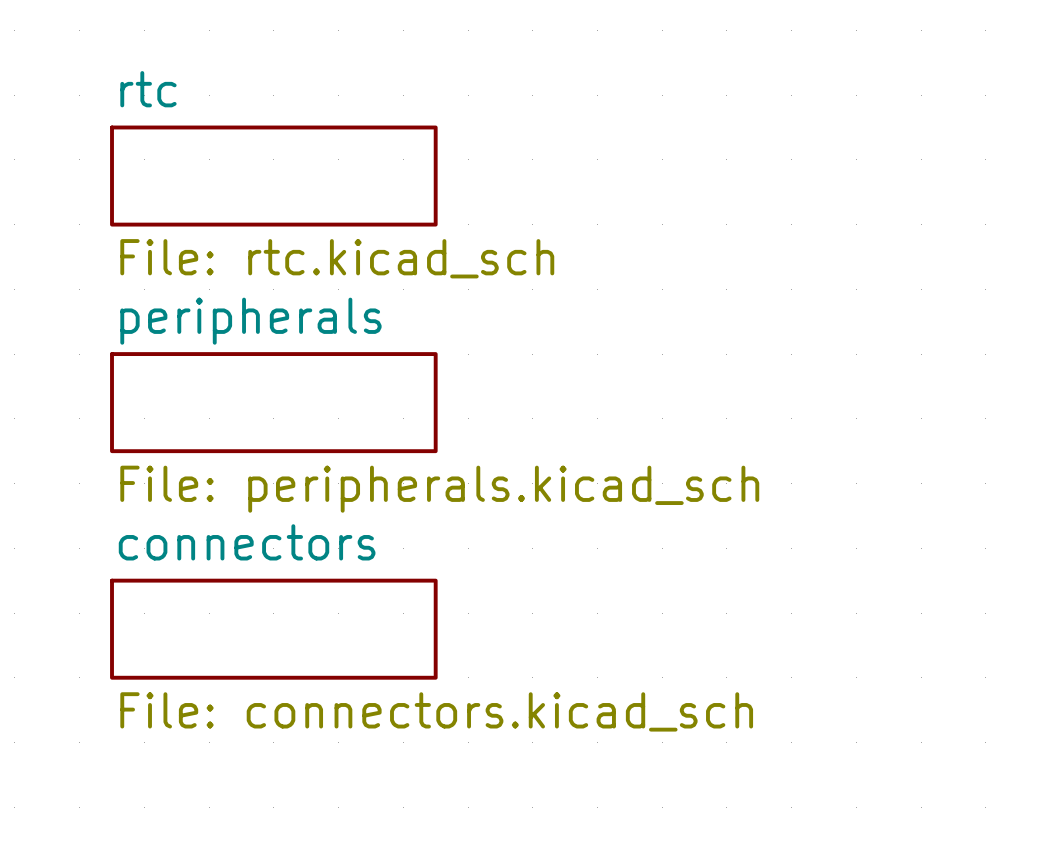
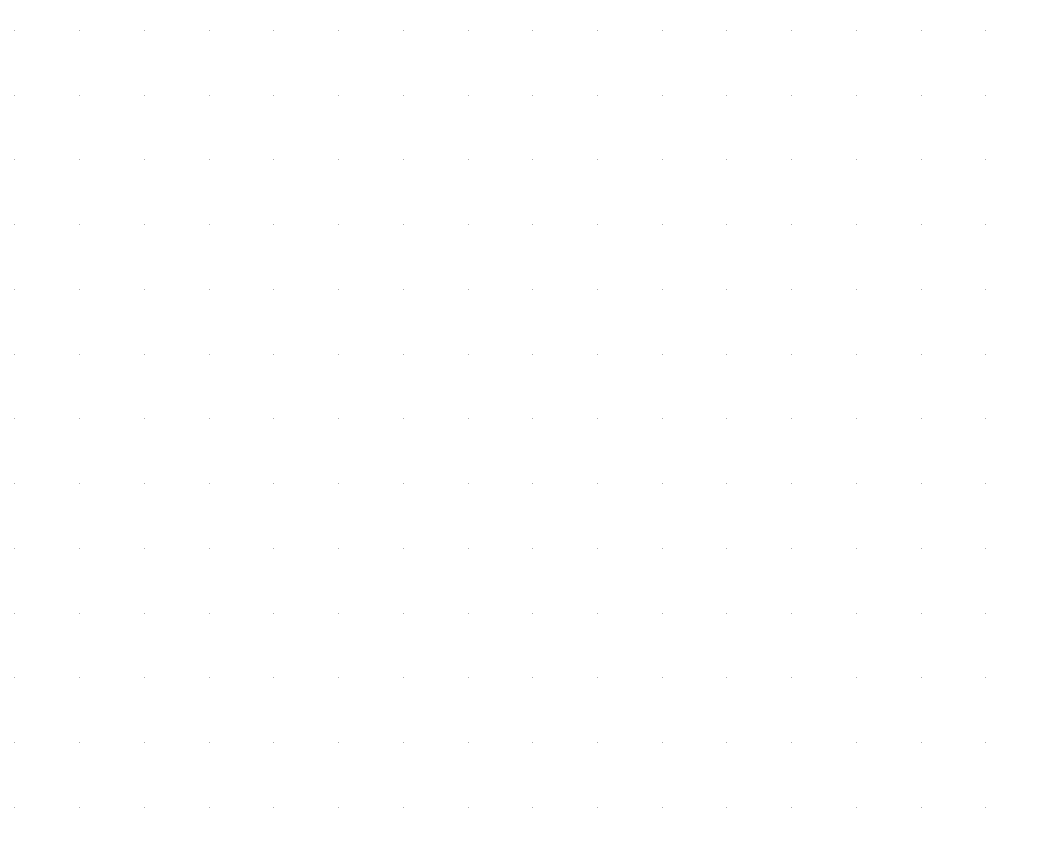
sheet rtc: File: rtc.kicad_sch (273, 176) -> none
sheet peripherals: File: peripherals.kicad_sch (273, 402) -> none
sheet connectors: File: connectors.kicad_sch (273, 629) -> none

